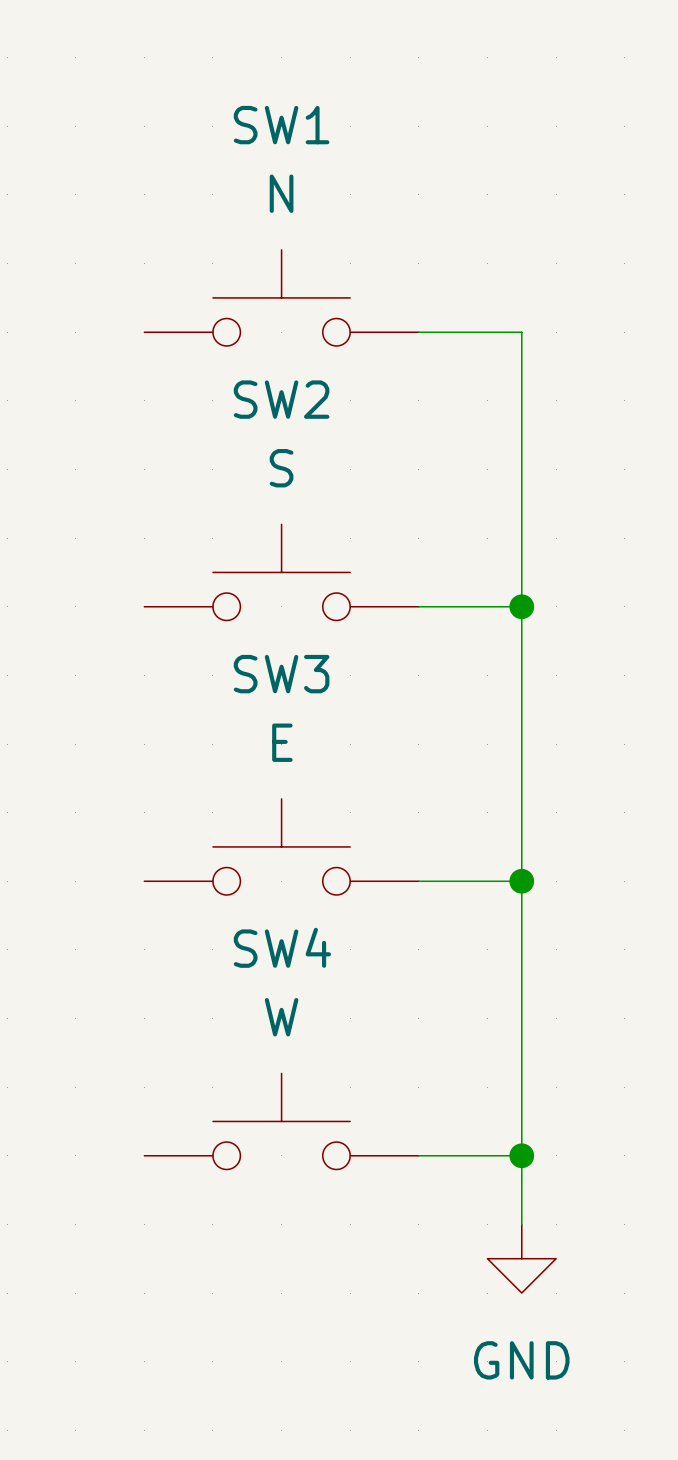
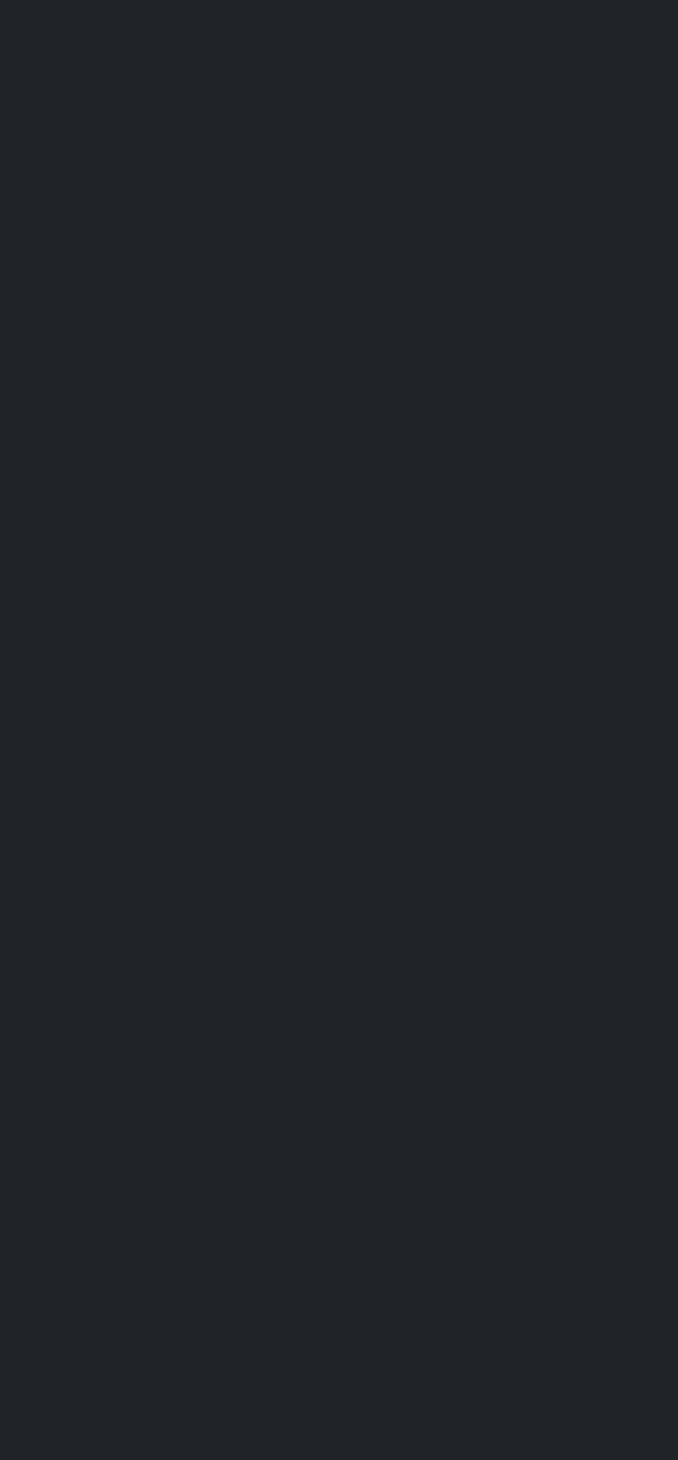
SW1: N (281, 297) -> none
wire: (418, 332) (521, 332) (521, 1224) -> none
SW2: S (281, 572) -> none
wire: (418, 606) (521, 606) -> none
junction: (521, 606) -> none
SW3: E (281, 846) -> none
wire: (418, 881) (521, 881) -> none
junction: (521, 881) -> none
SW4: W (281, 1121) -> none
wire: (418, 1155) (521, 1155) -> none
junction: (521, 1155) -> none
power symbol: GND (521, 1258) -> none

